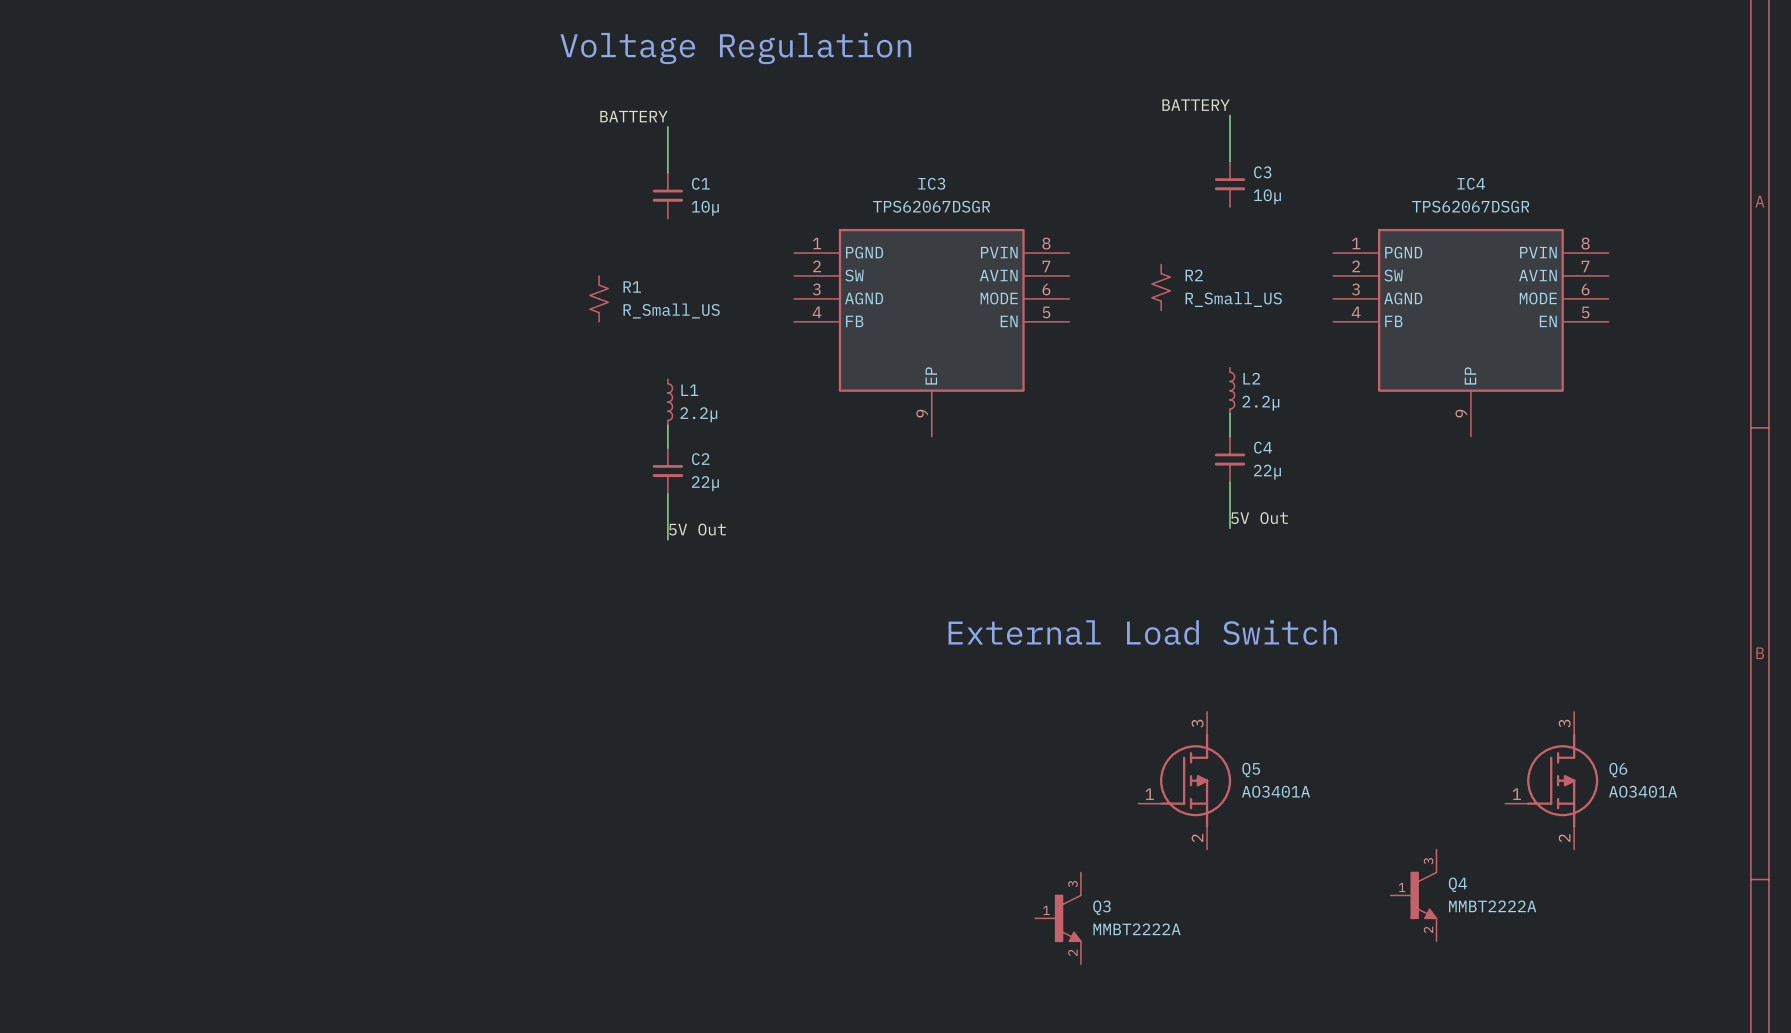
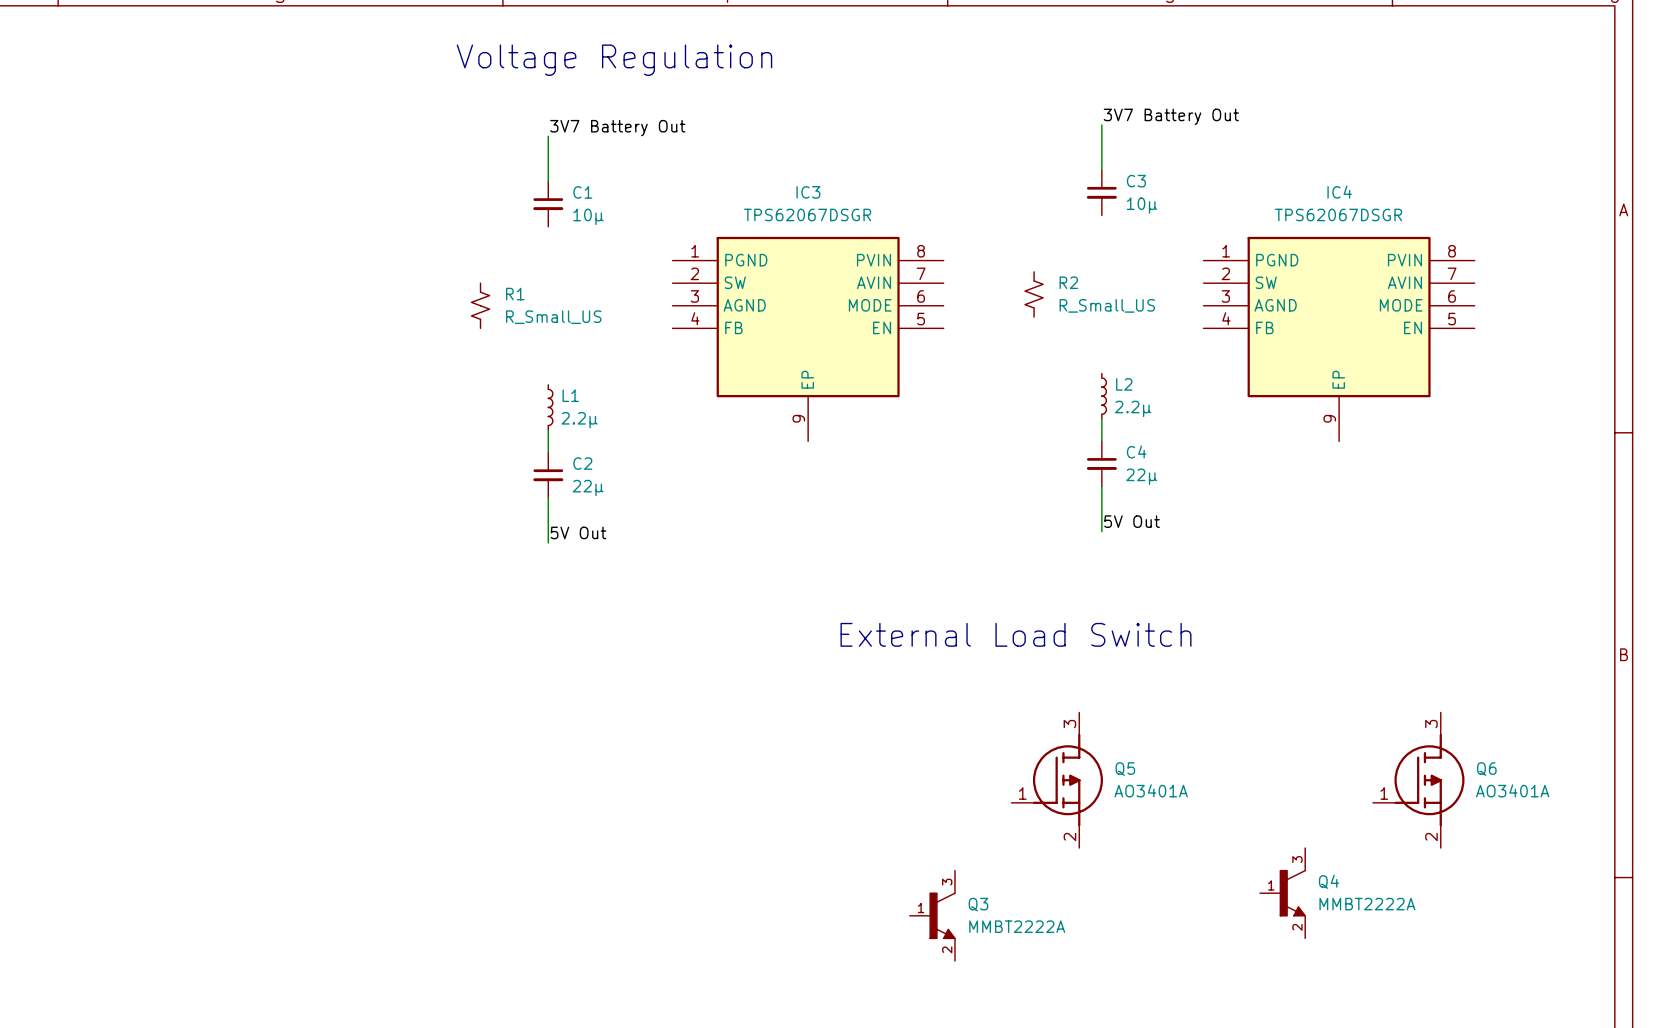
label: BATTERY (1196, 105) -> 3V7 Battery Out (1171, 116)
label: BATTERY (633, 116) -> 3V7 Battery Out (617, 128)

